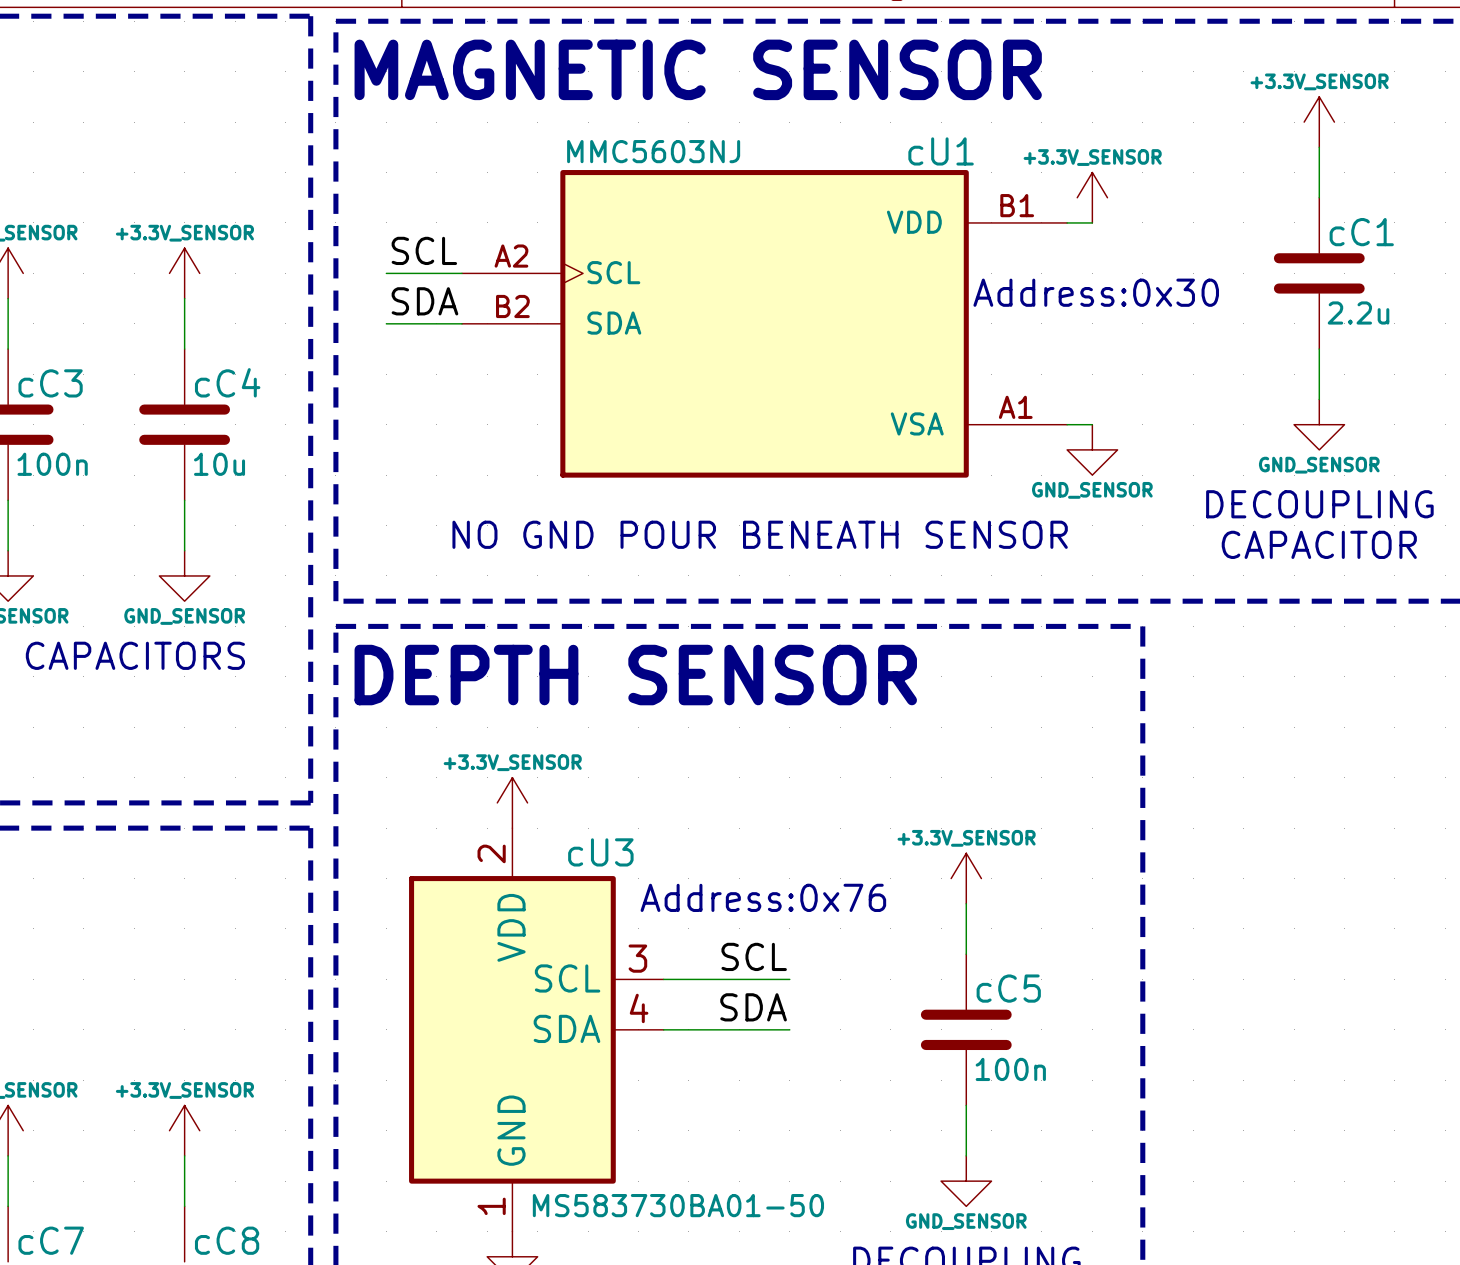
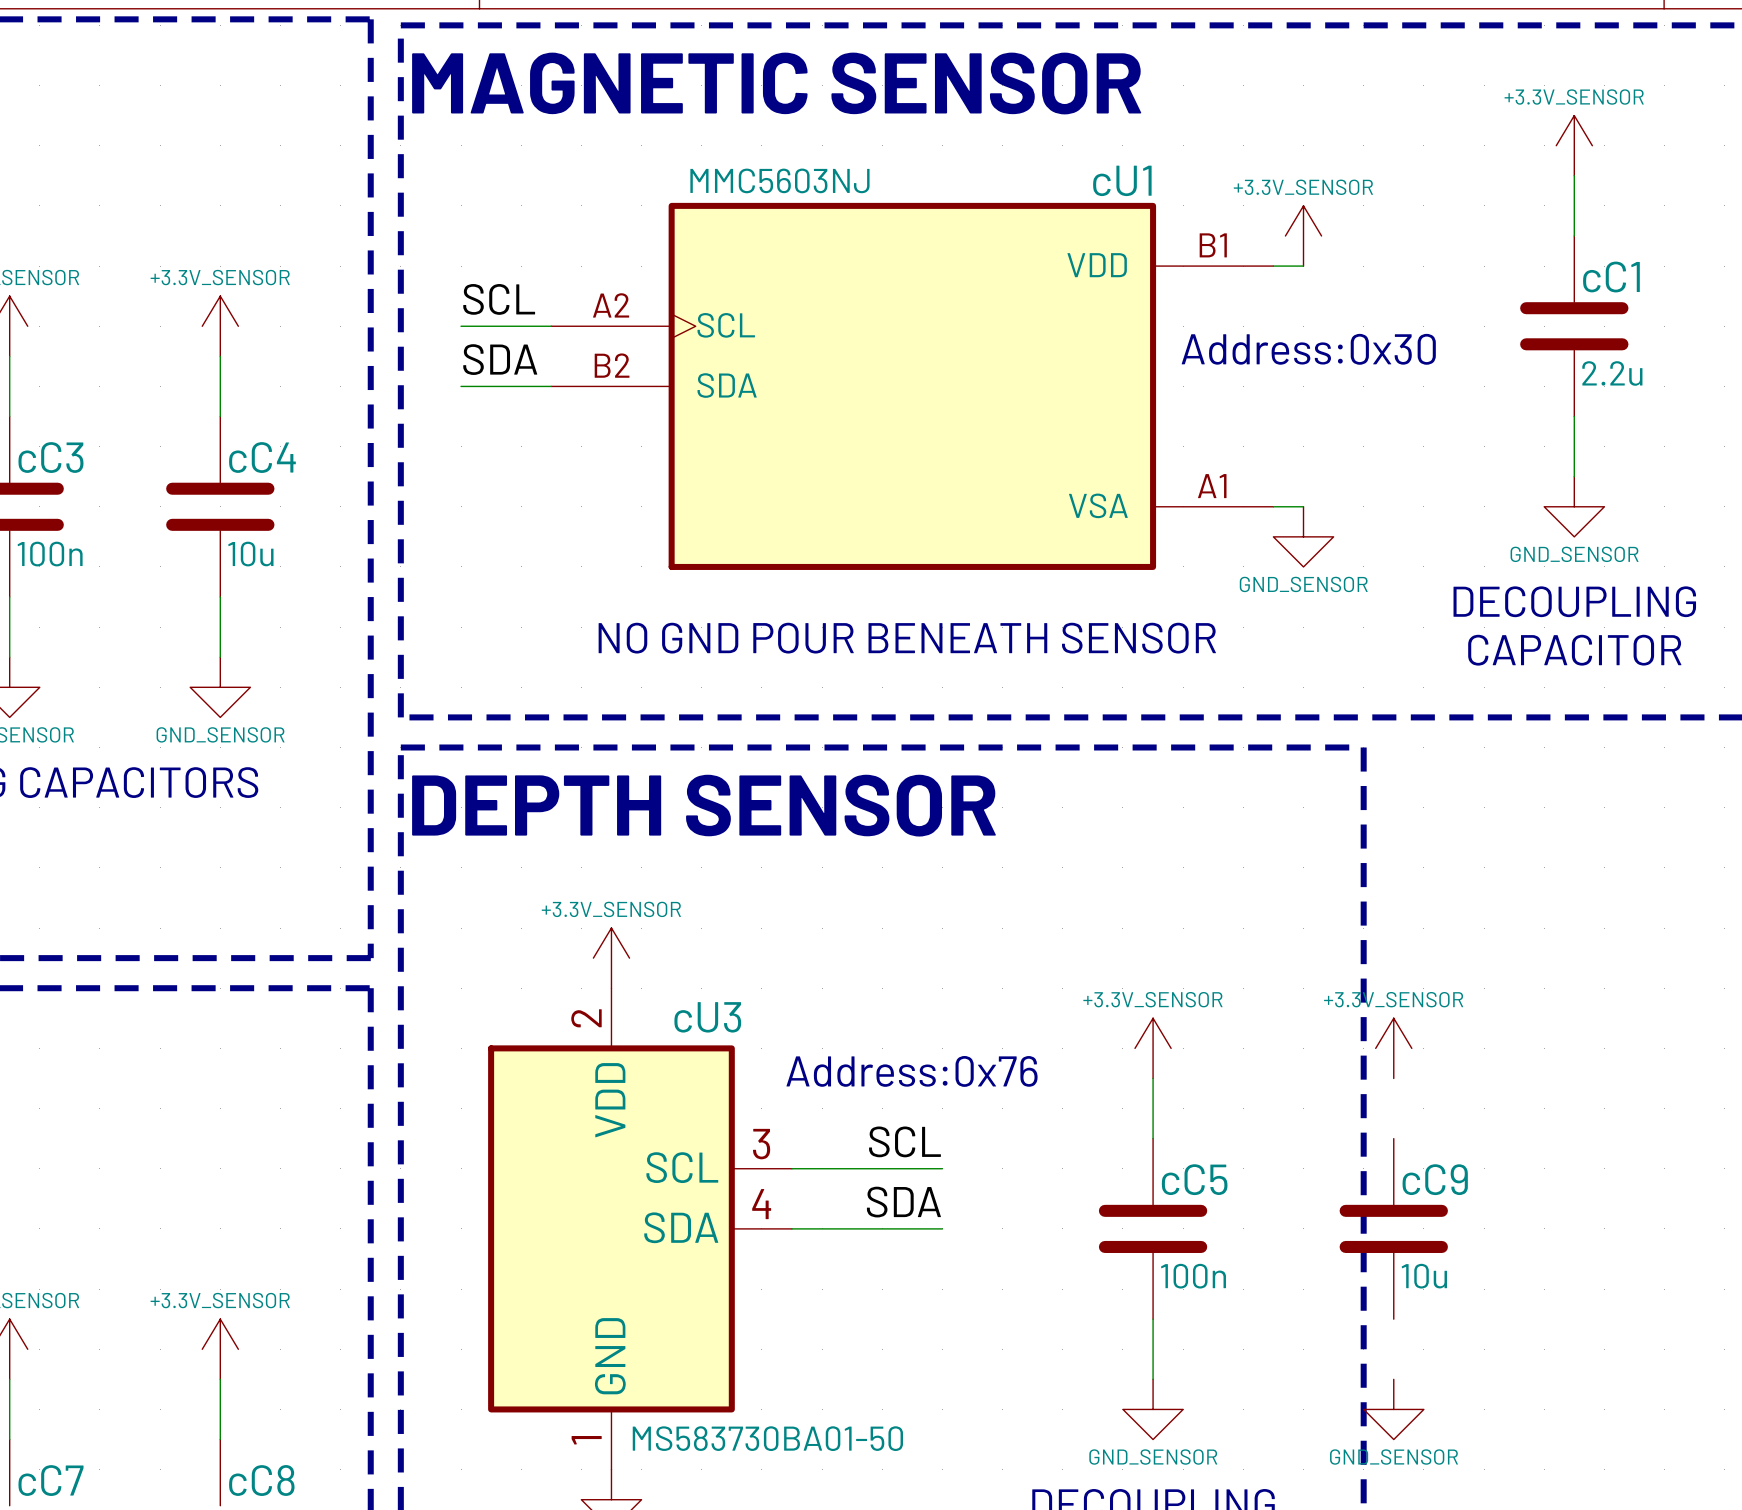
power symbol: none -> +3.3V_SENSOR (1393, 1048)
cC9: none -> 10u (1393, 1228)
power symbol: none -> GND_SENSOR (1393, 1409)

